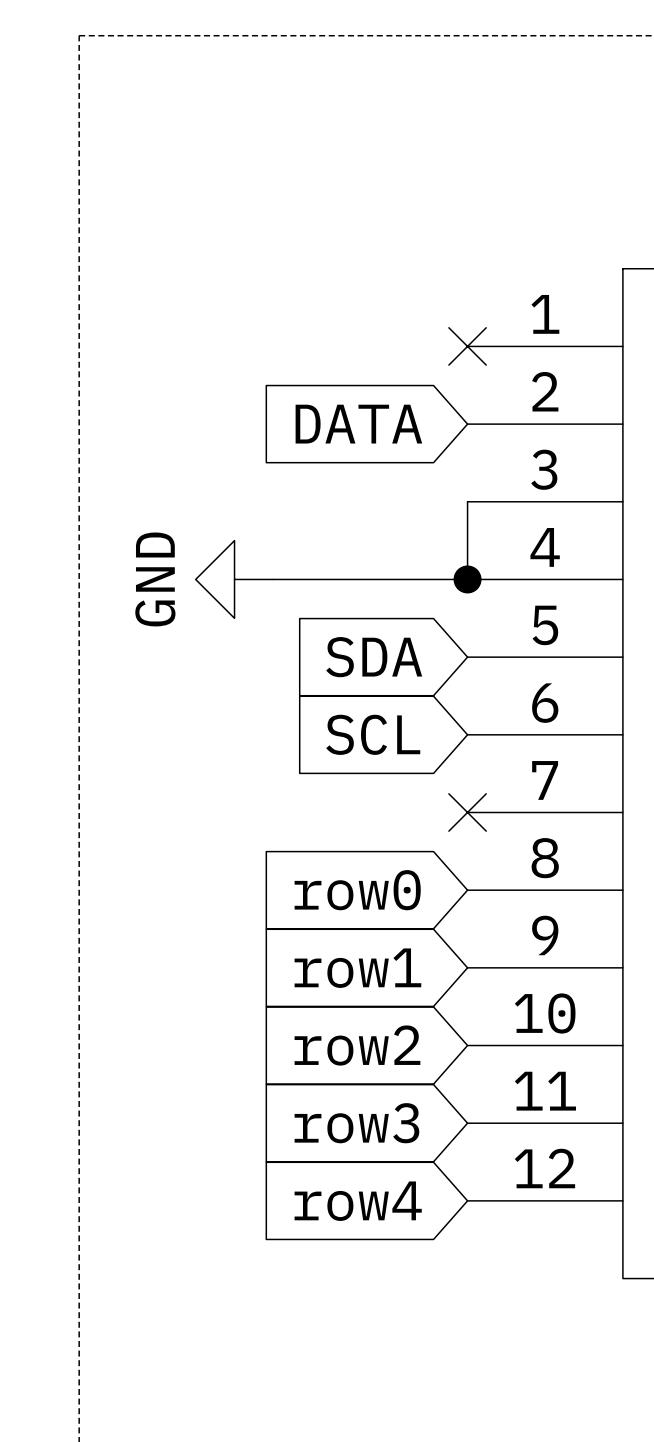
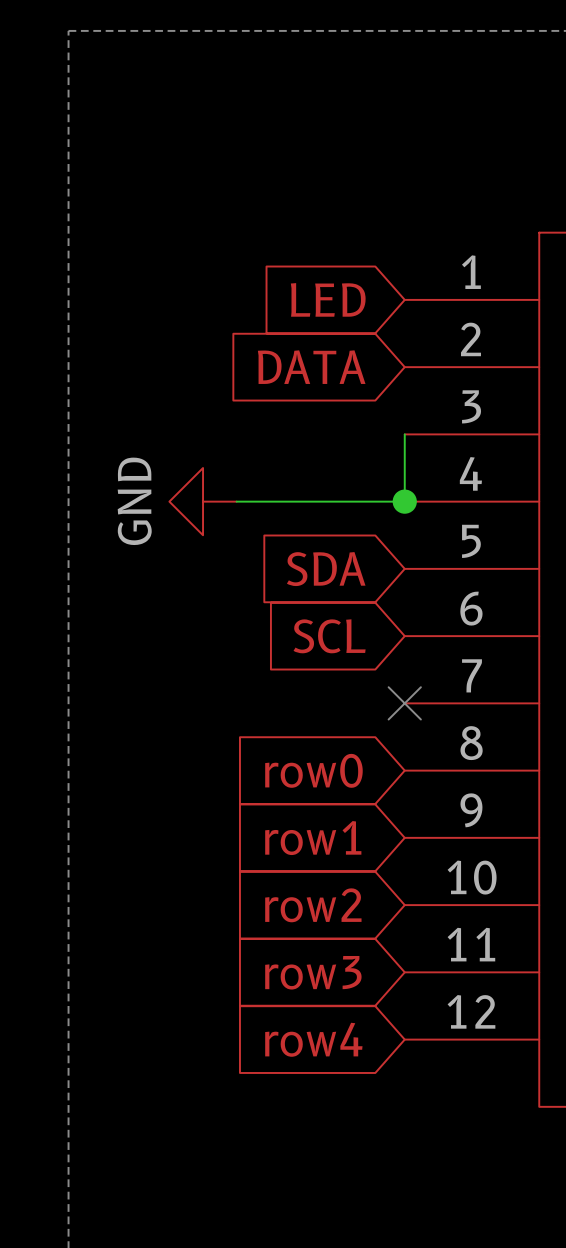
global label: none -> LED (328, 299)
no-connect mark: (467, 346) -> none

